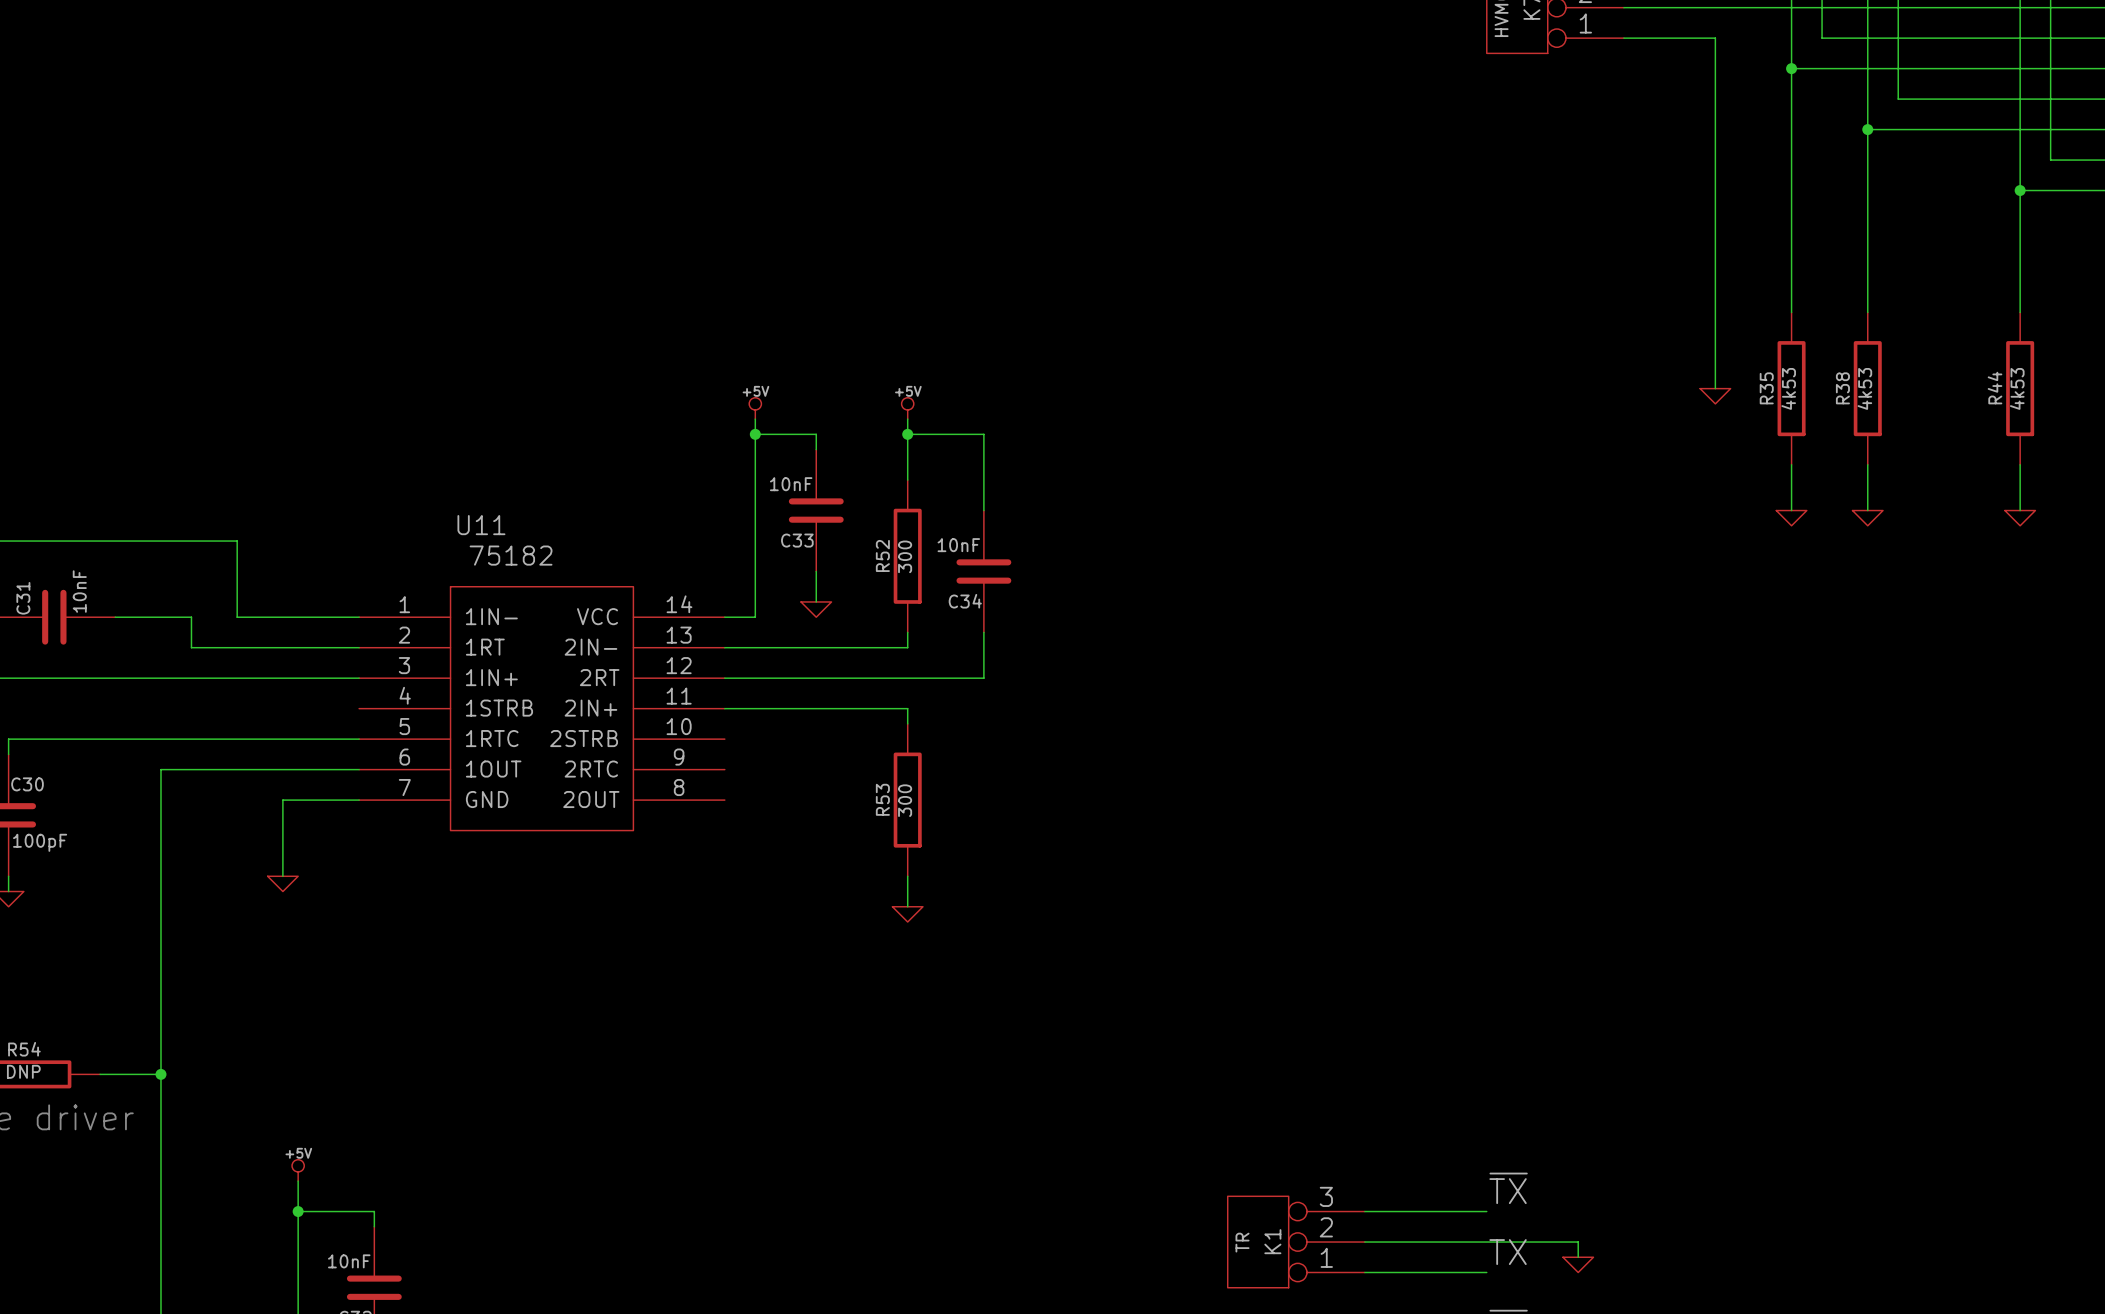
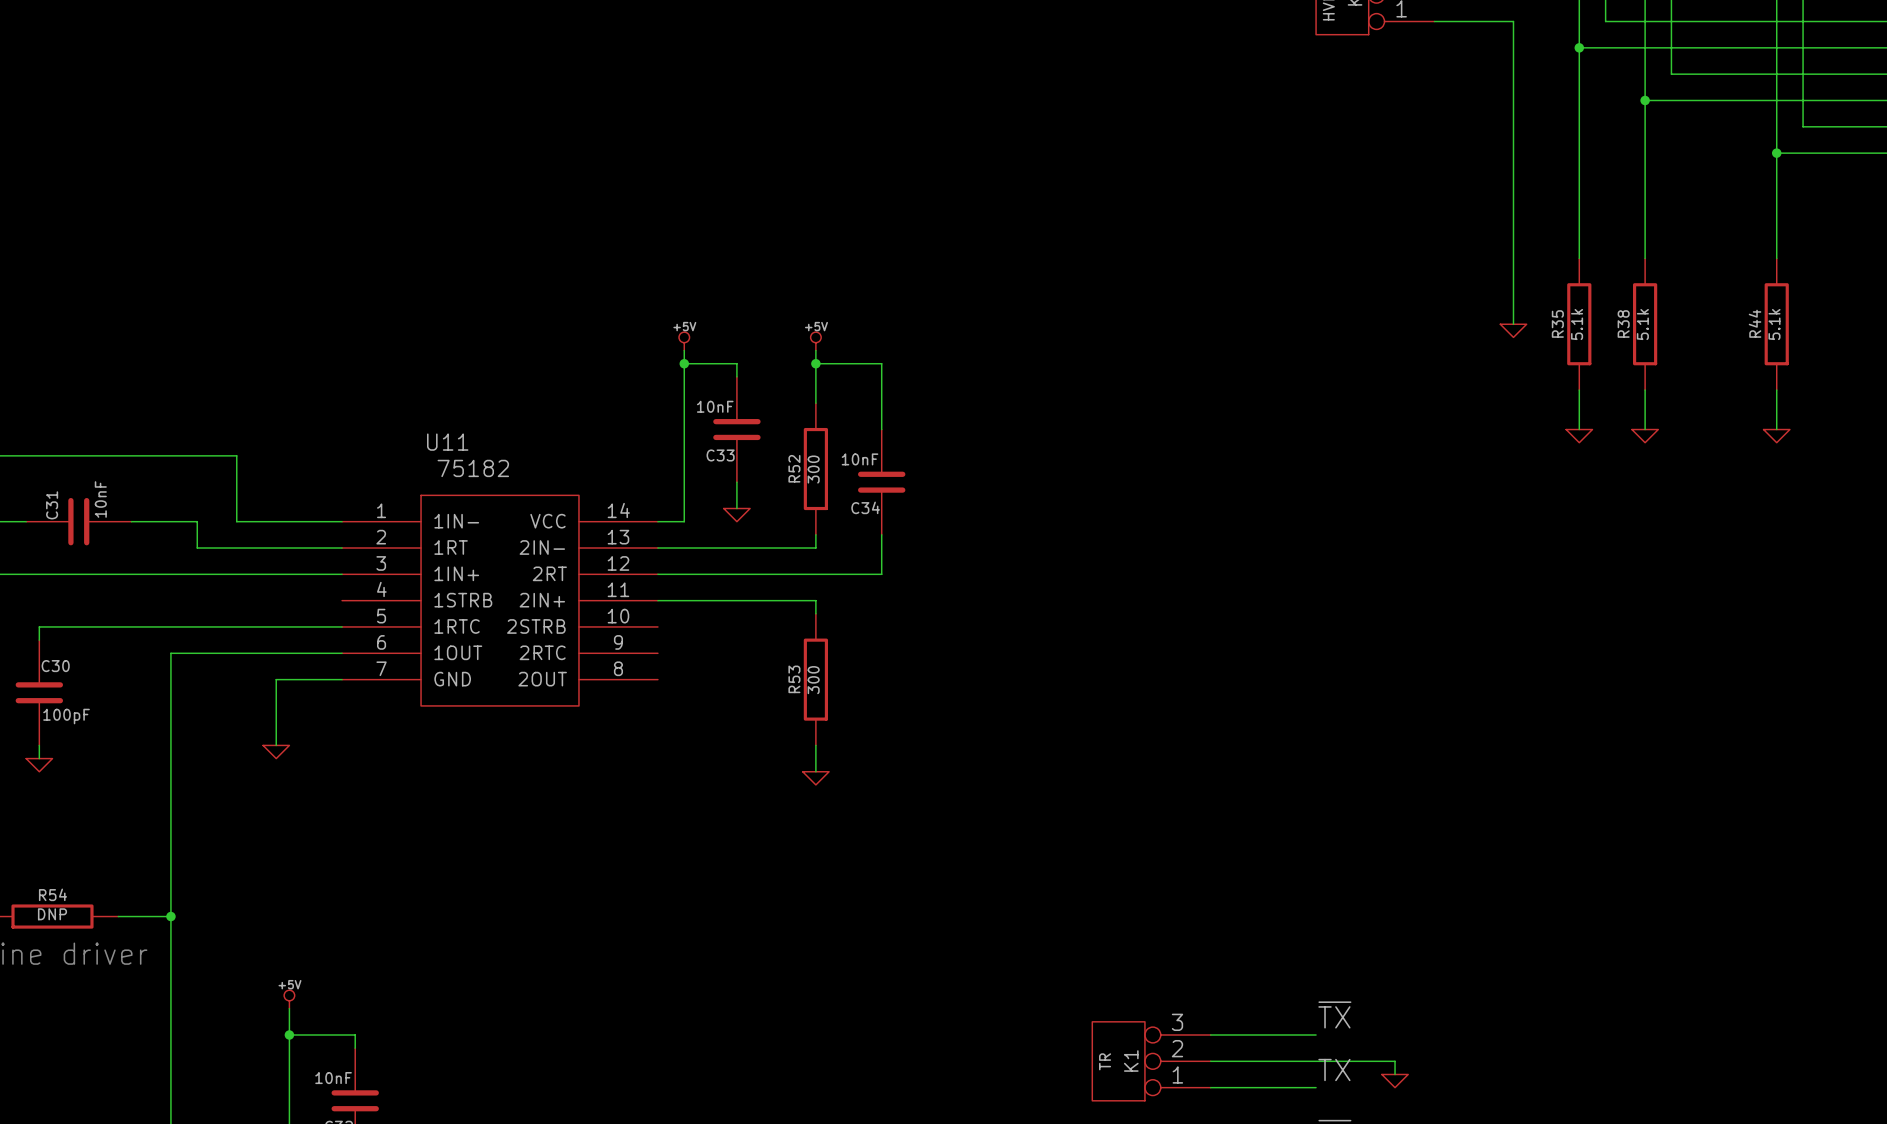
R35 value: 4k53 (1788, 388) -> 5.1k (1577, 324)
R38 value: 4k53 (1864, 388) -> 5.1k (1642, 324)
R44 value: 4k53 (2017, 388) -> 5.1k (1774, 324)

